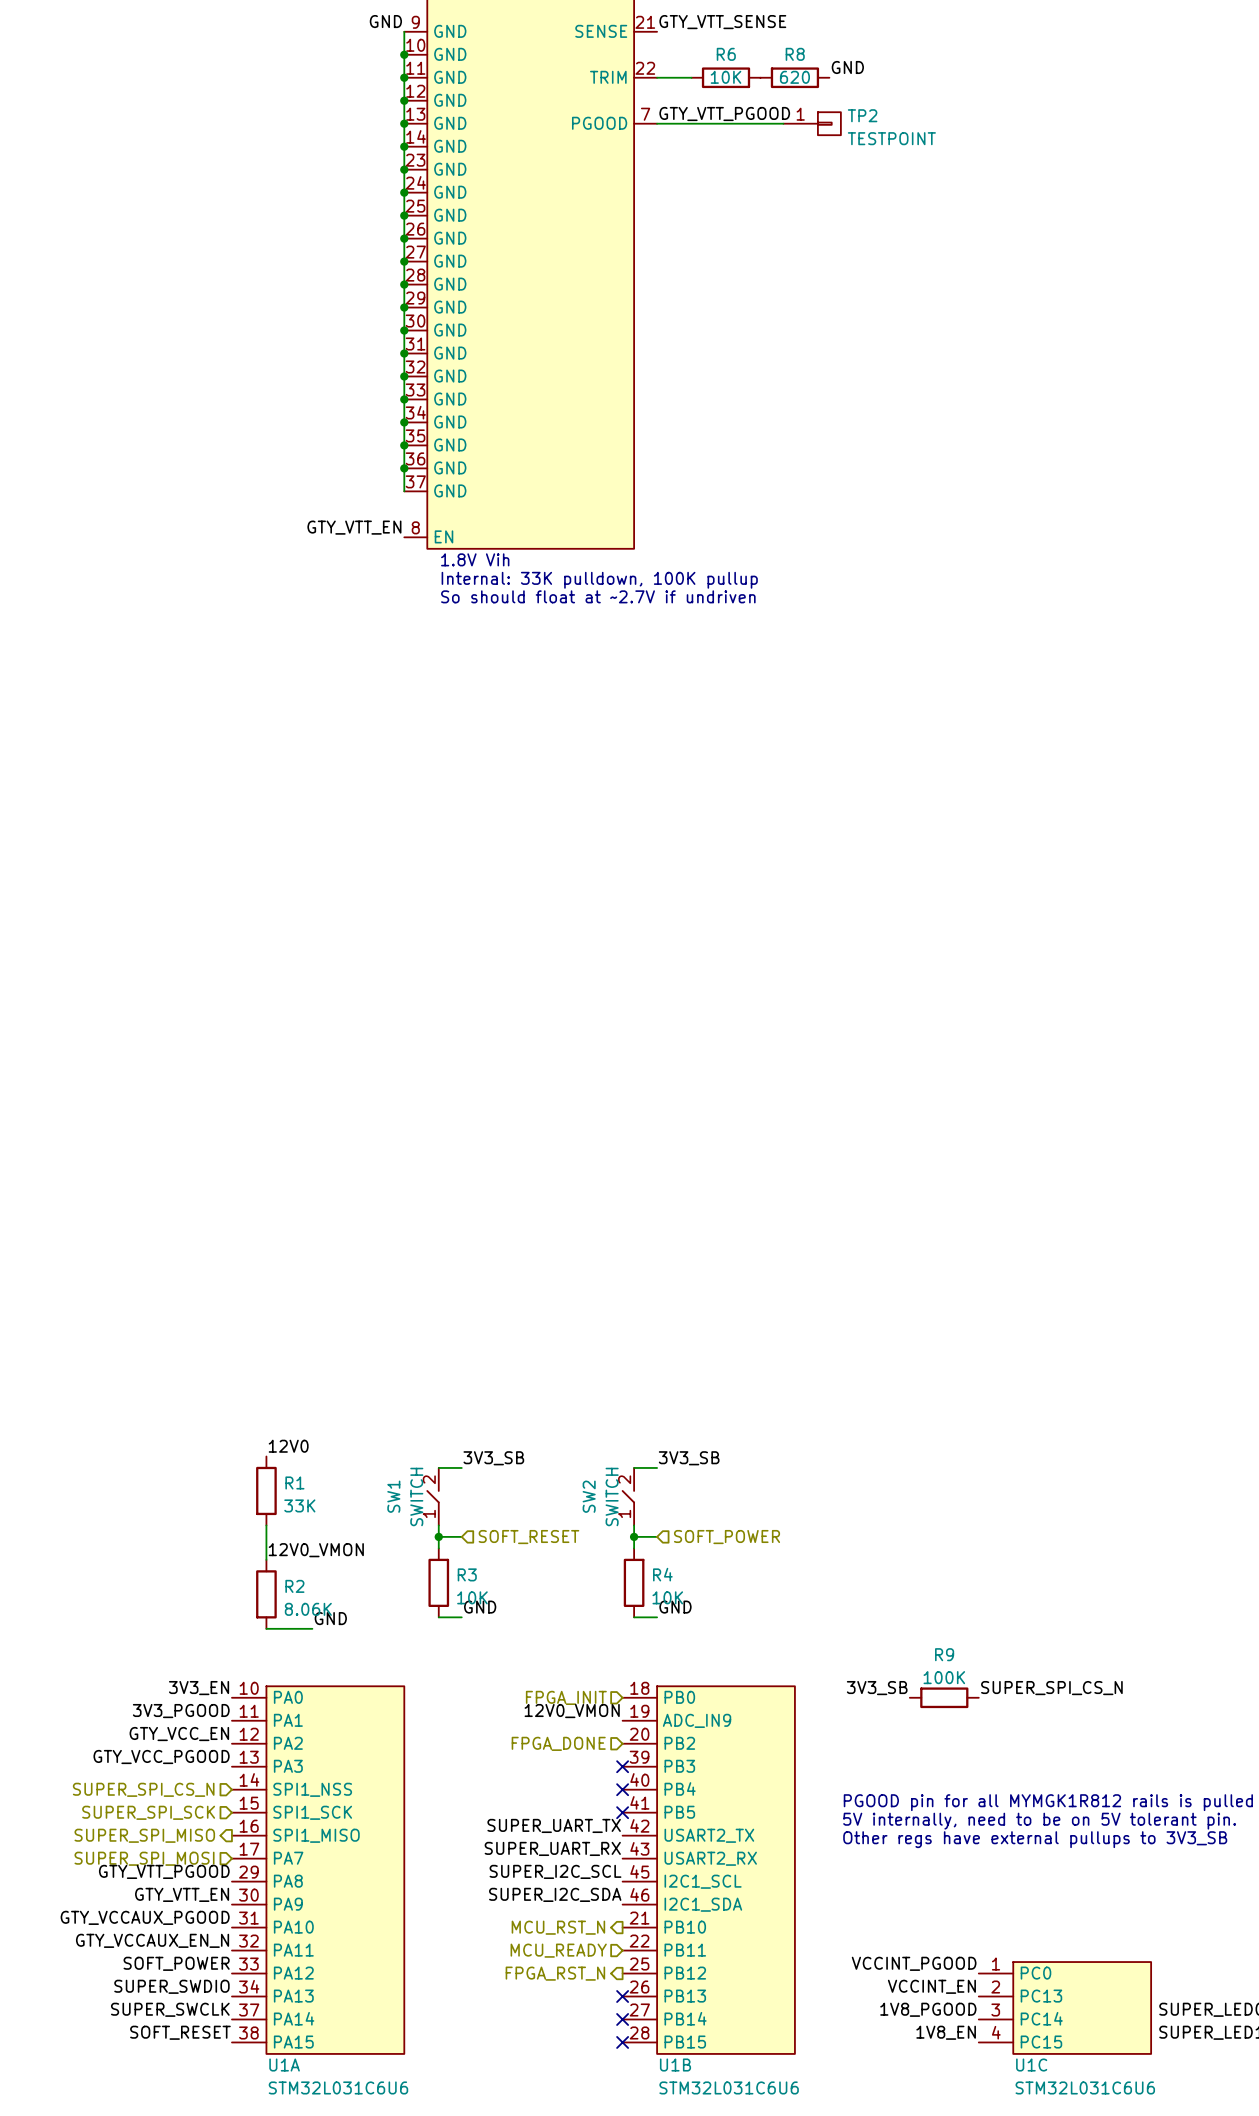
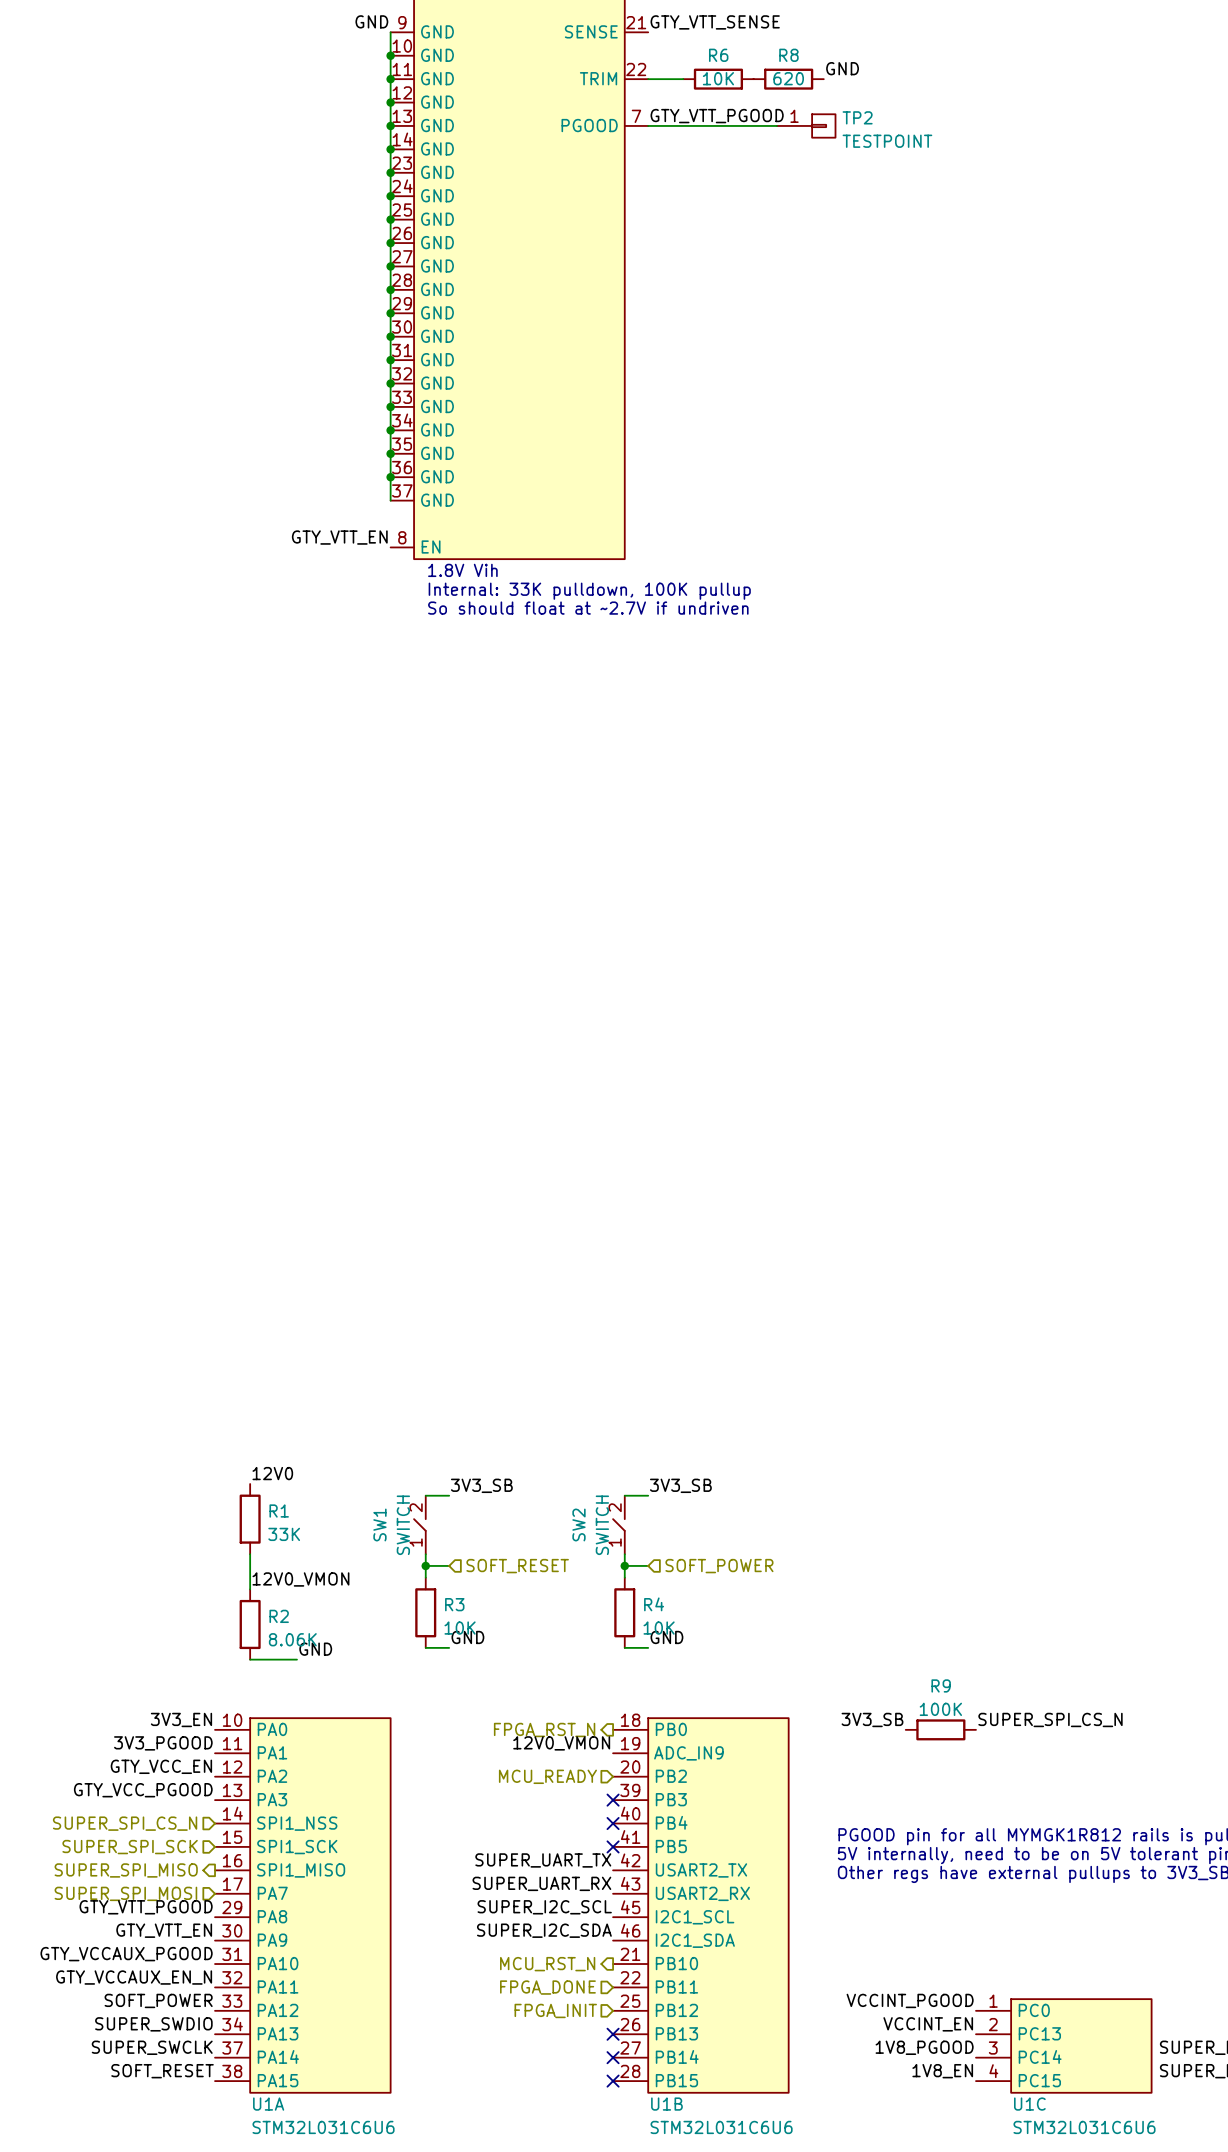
hierarchical label shape: input (566, 1697) -> output (544, 1729)
hierarchical label: FPGA_INIT (566, 1697) -> FPGA_RST_N (544, 1729)
hierarchical label: FPGA_DONE (558, 1743) -> MCU_READY (547, 1776)
hierarchical label: MCU_READY (558, 1950) -> FPGA_DONE (547, 1987)
hierarchical label shape: output (555, 1973) -> input (555, 2010)
hierarchical label: FPGA_RST_N (555, 1973) -> FPGA_INIT (555, 2010)

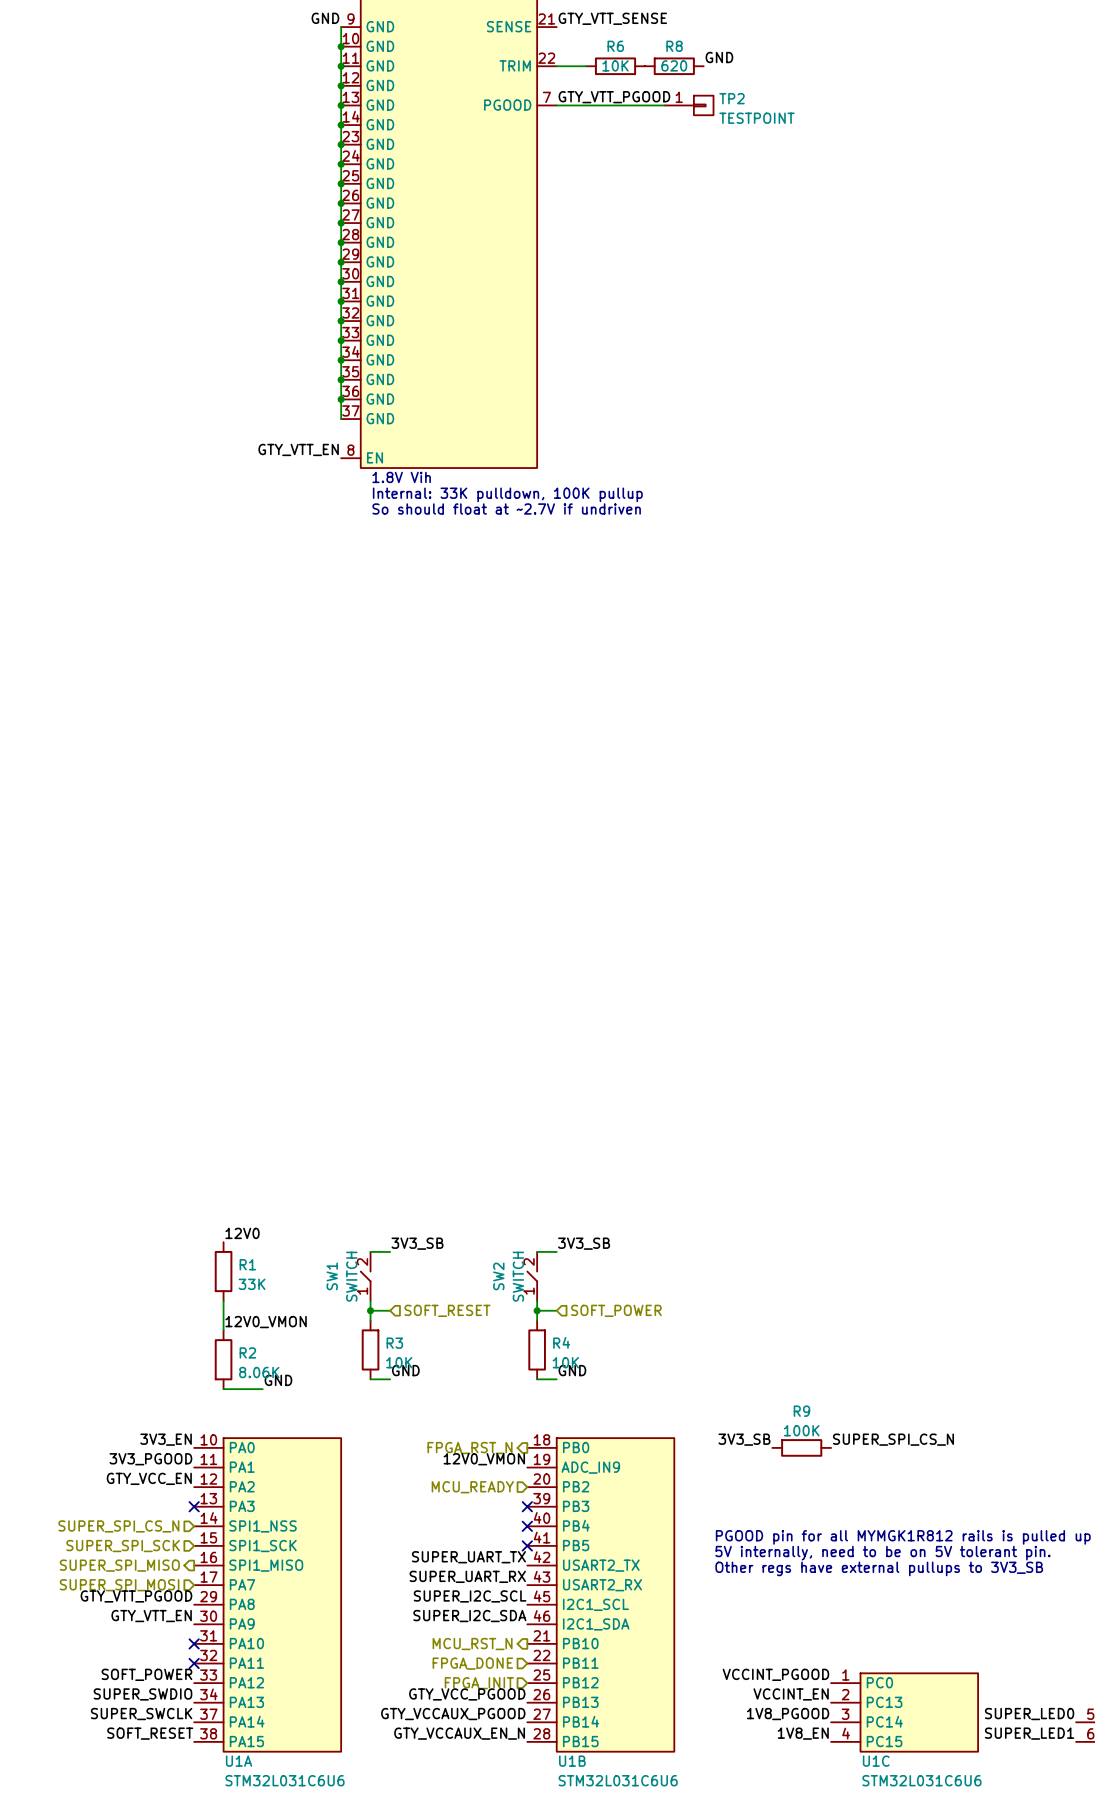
label: GTY_VCC_PGOOD (143, 1790) -> none
no-connect mark: none -> (194, 1506)
label: GTY_VCCAUX_PGOOD (126, 1954) -> none
no-connect mark: none -> (194, 1643)
label: GTY_VCCAUX_EN_N (134, 1977) -> none
no-connect mark: none -> (194, 1663)
label: none -> GTY_VCC_PGOOD (467, 1694)
no-connect mark: (613, 2034) -> none
label: none -> GTY_VCCAUX_PGOOD (453, 1714)
no-connect mark: (613, 2057) -> none
label: none -> GTY_VCCAUX_EN_N (459, 1733)
no-connect mark: (613, 2081) -> none

